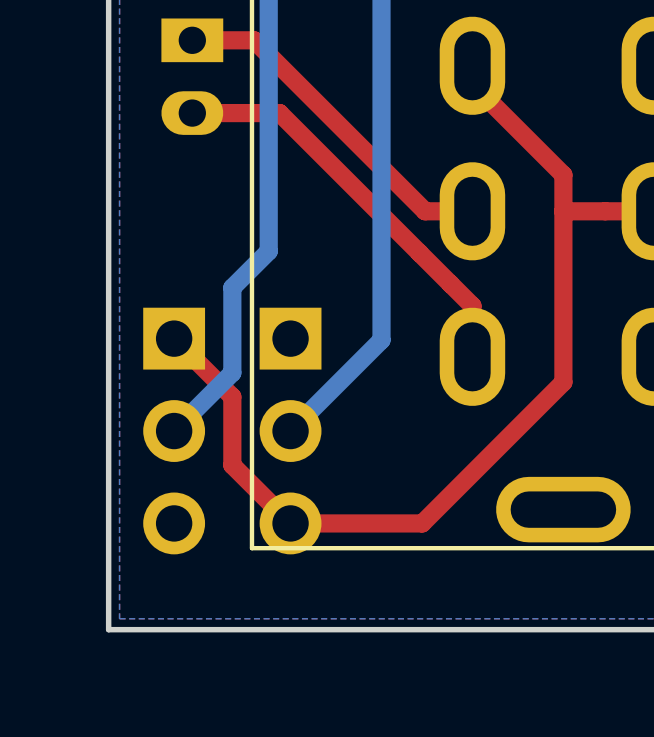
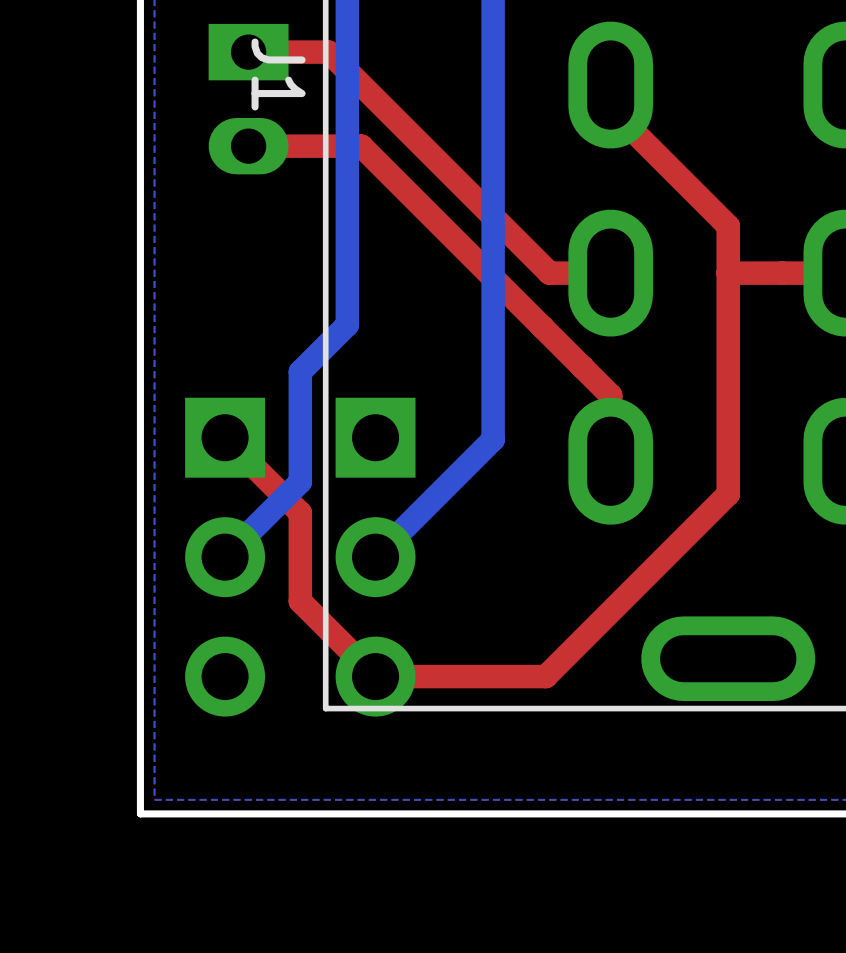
J1 name: none -> J1 (278, 74)

